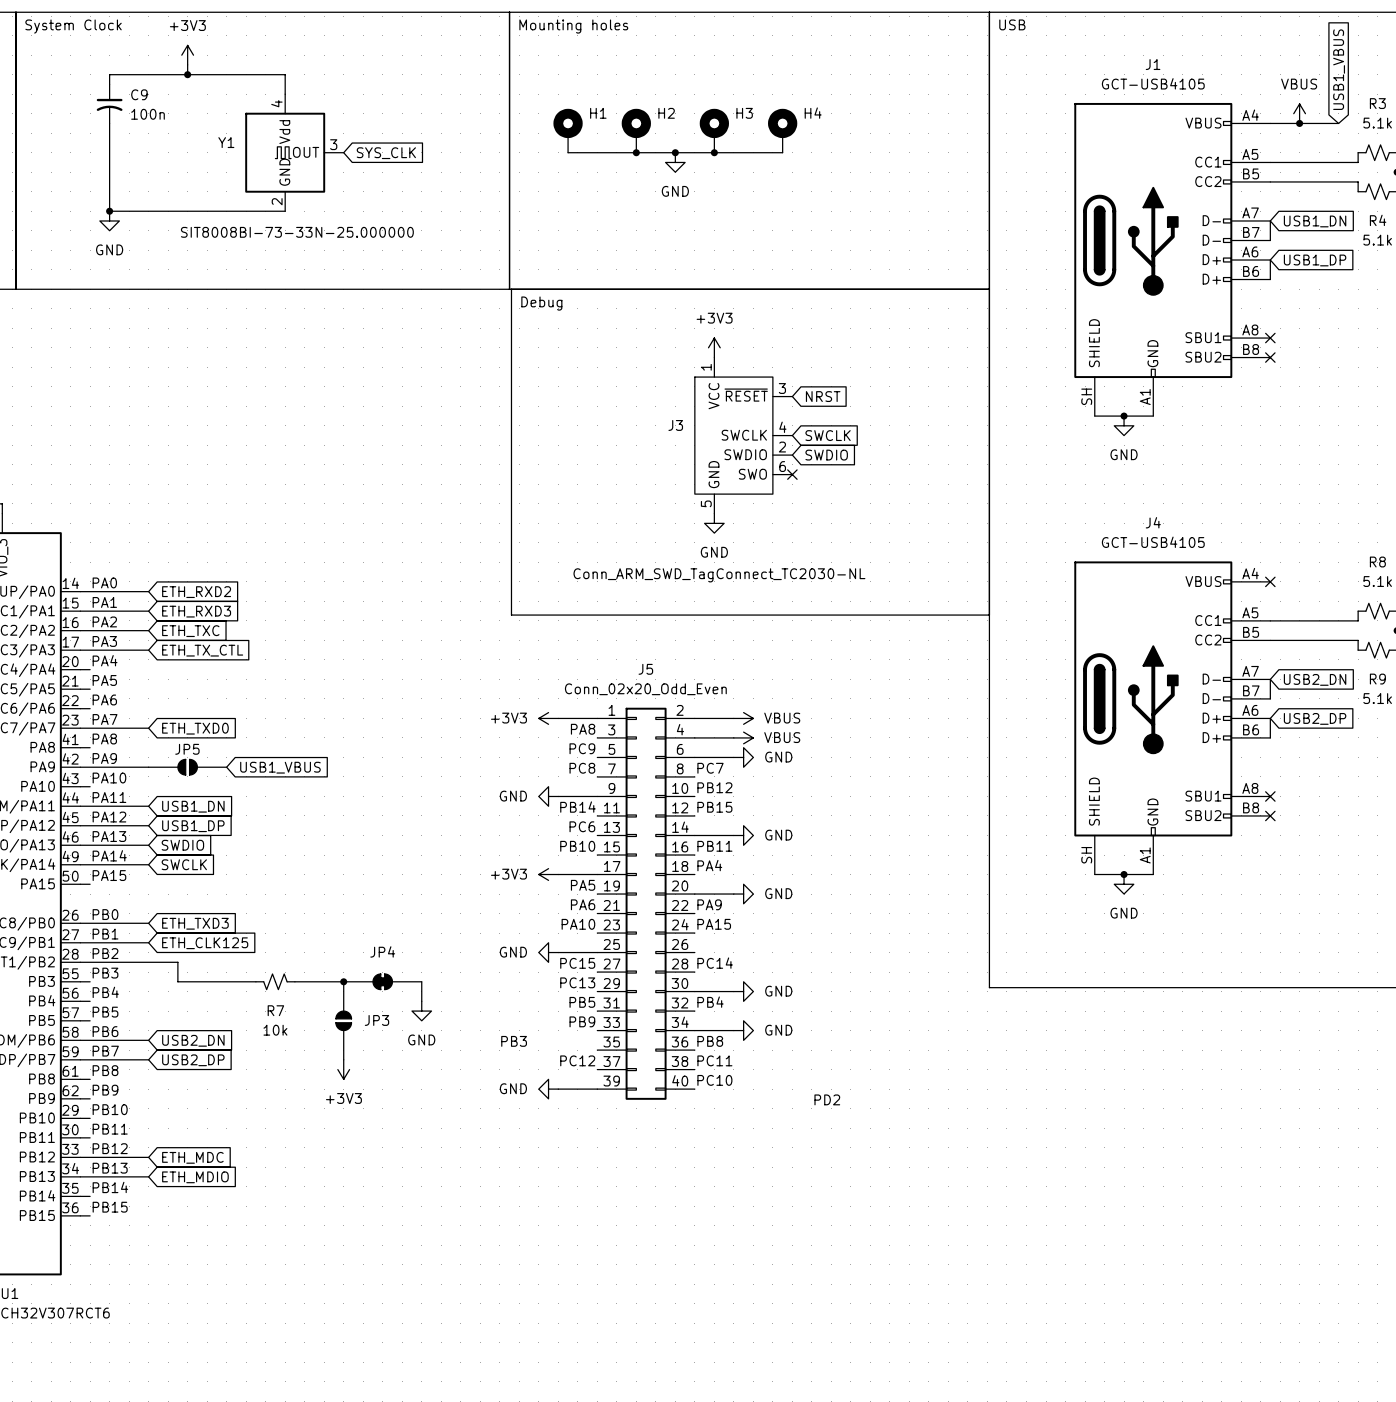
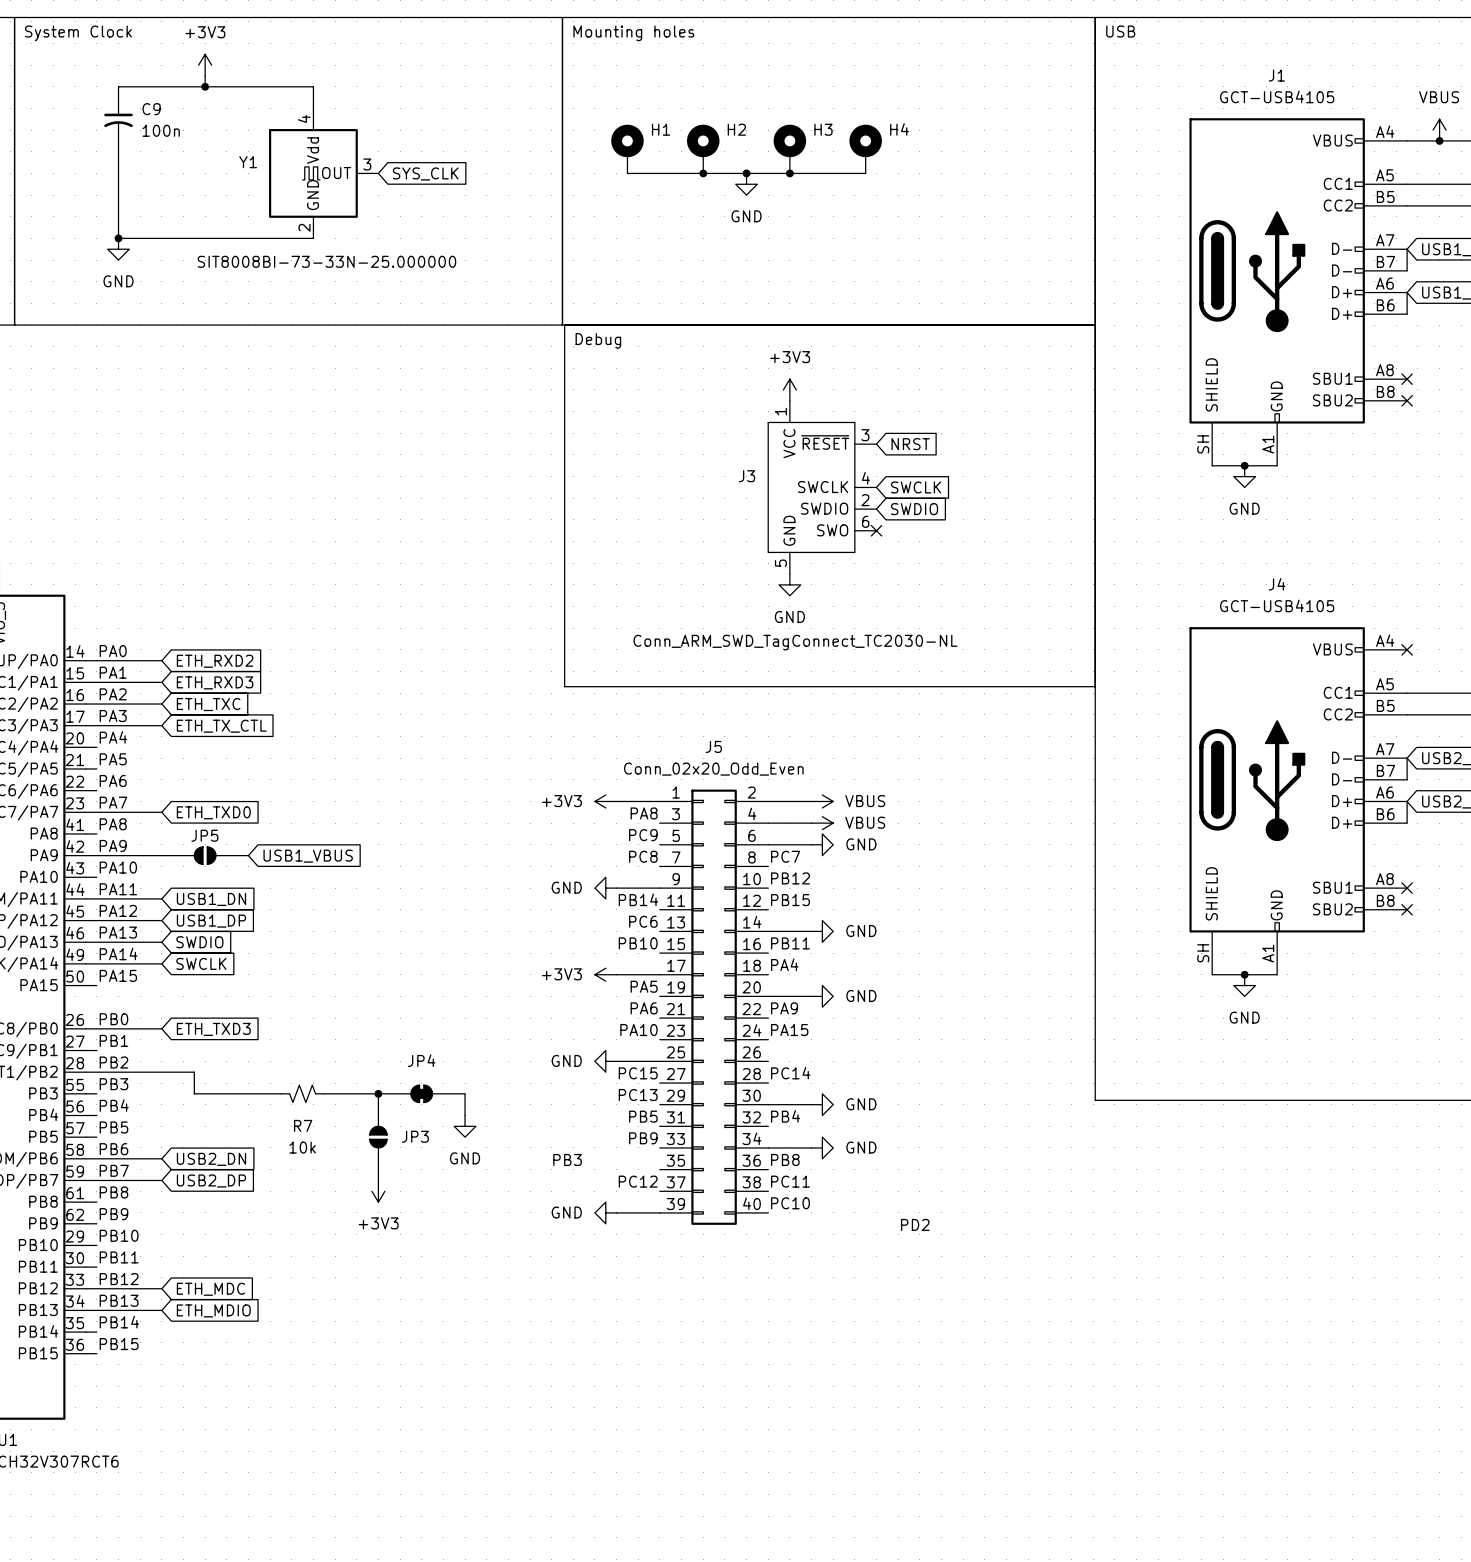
wire: (90, 942) (148, 942) -> none
global label: ETH_CLK125 (205, 943) -> none

